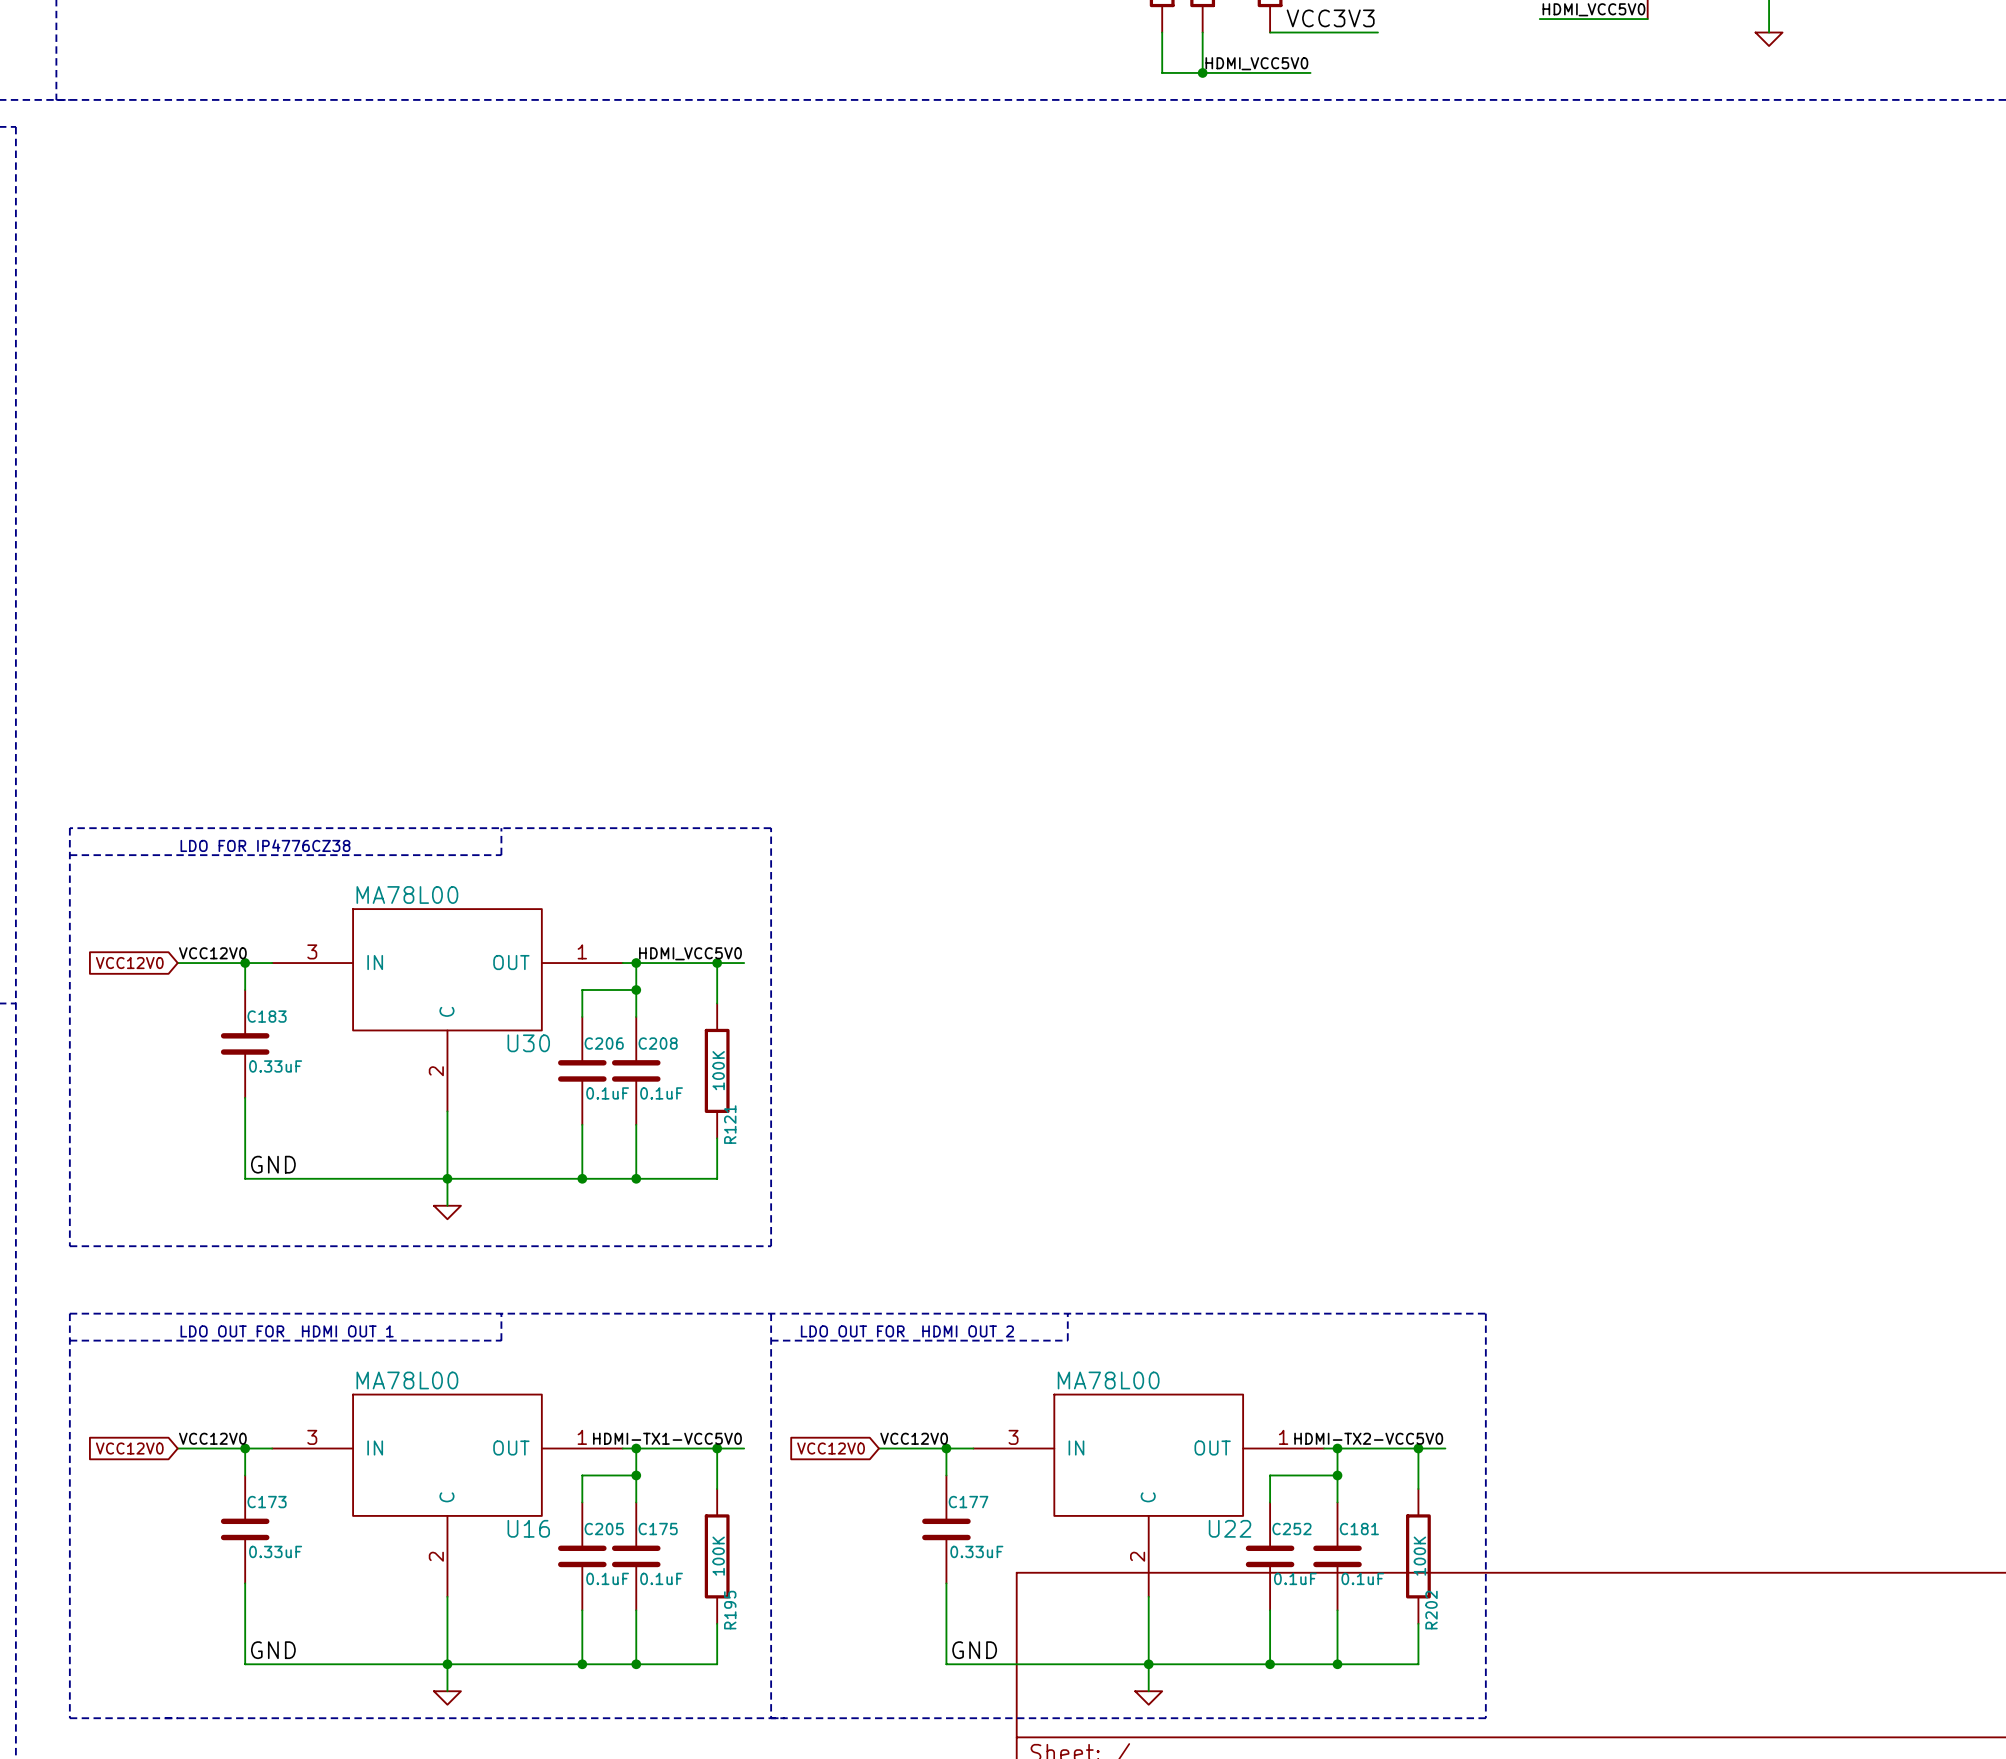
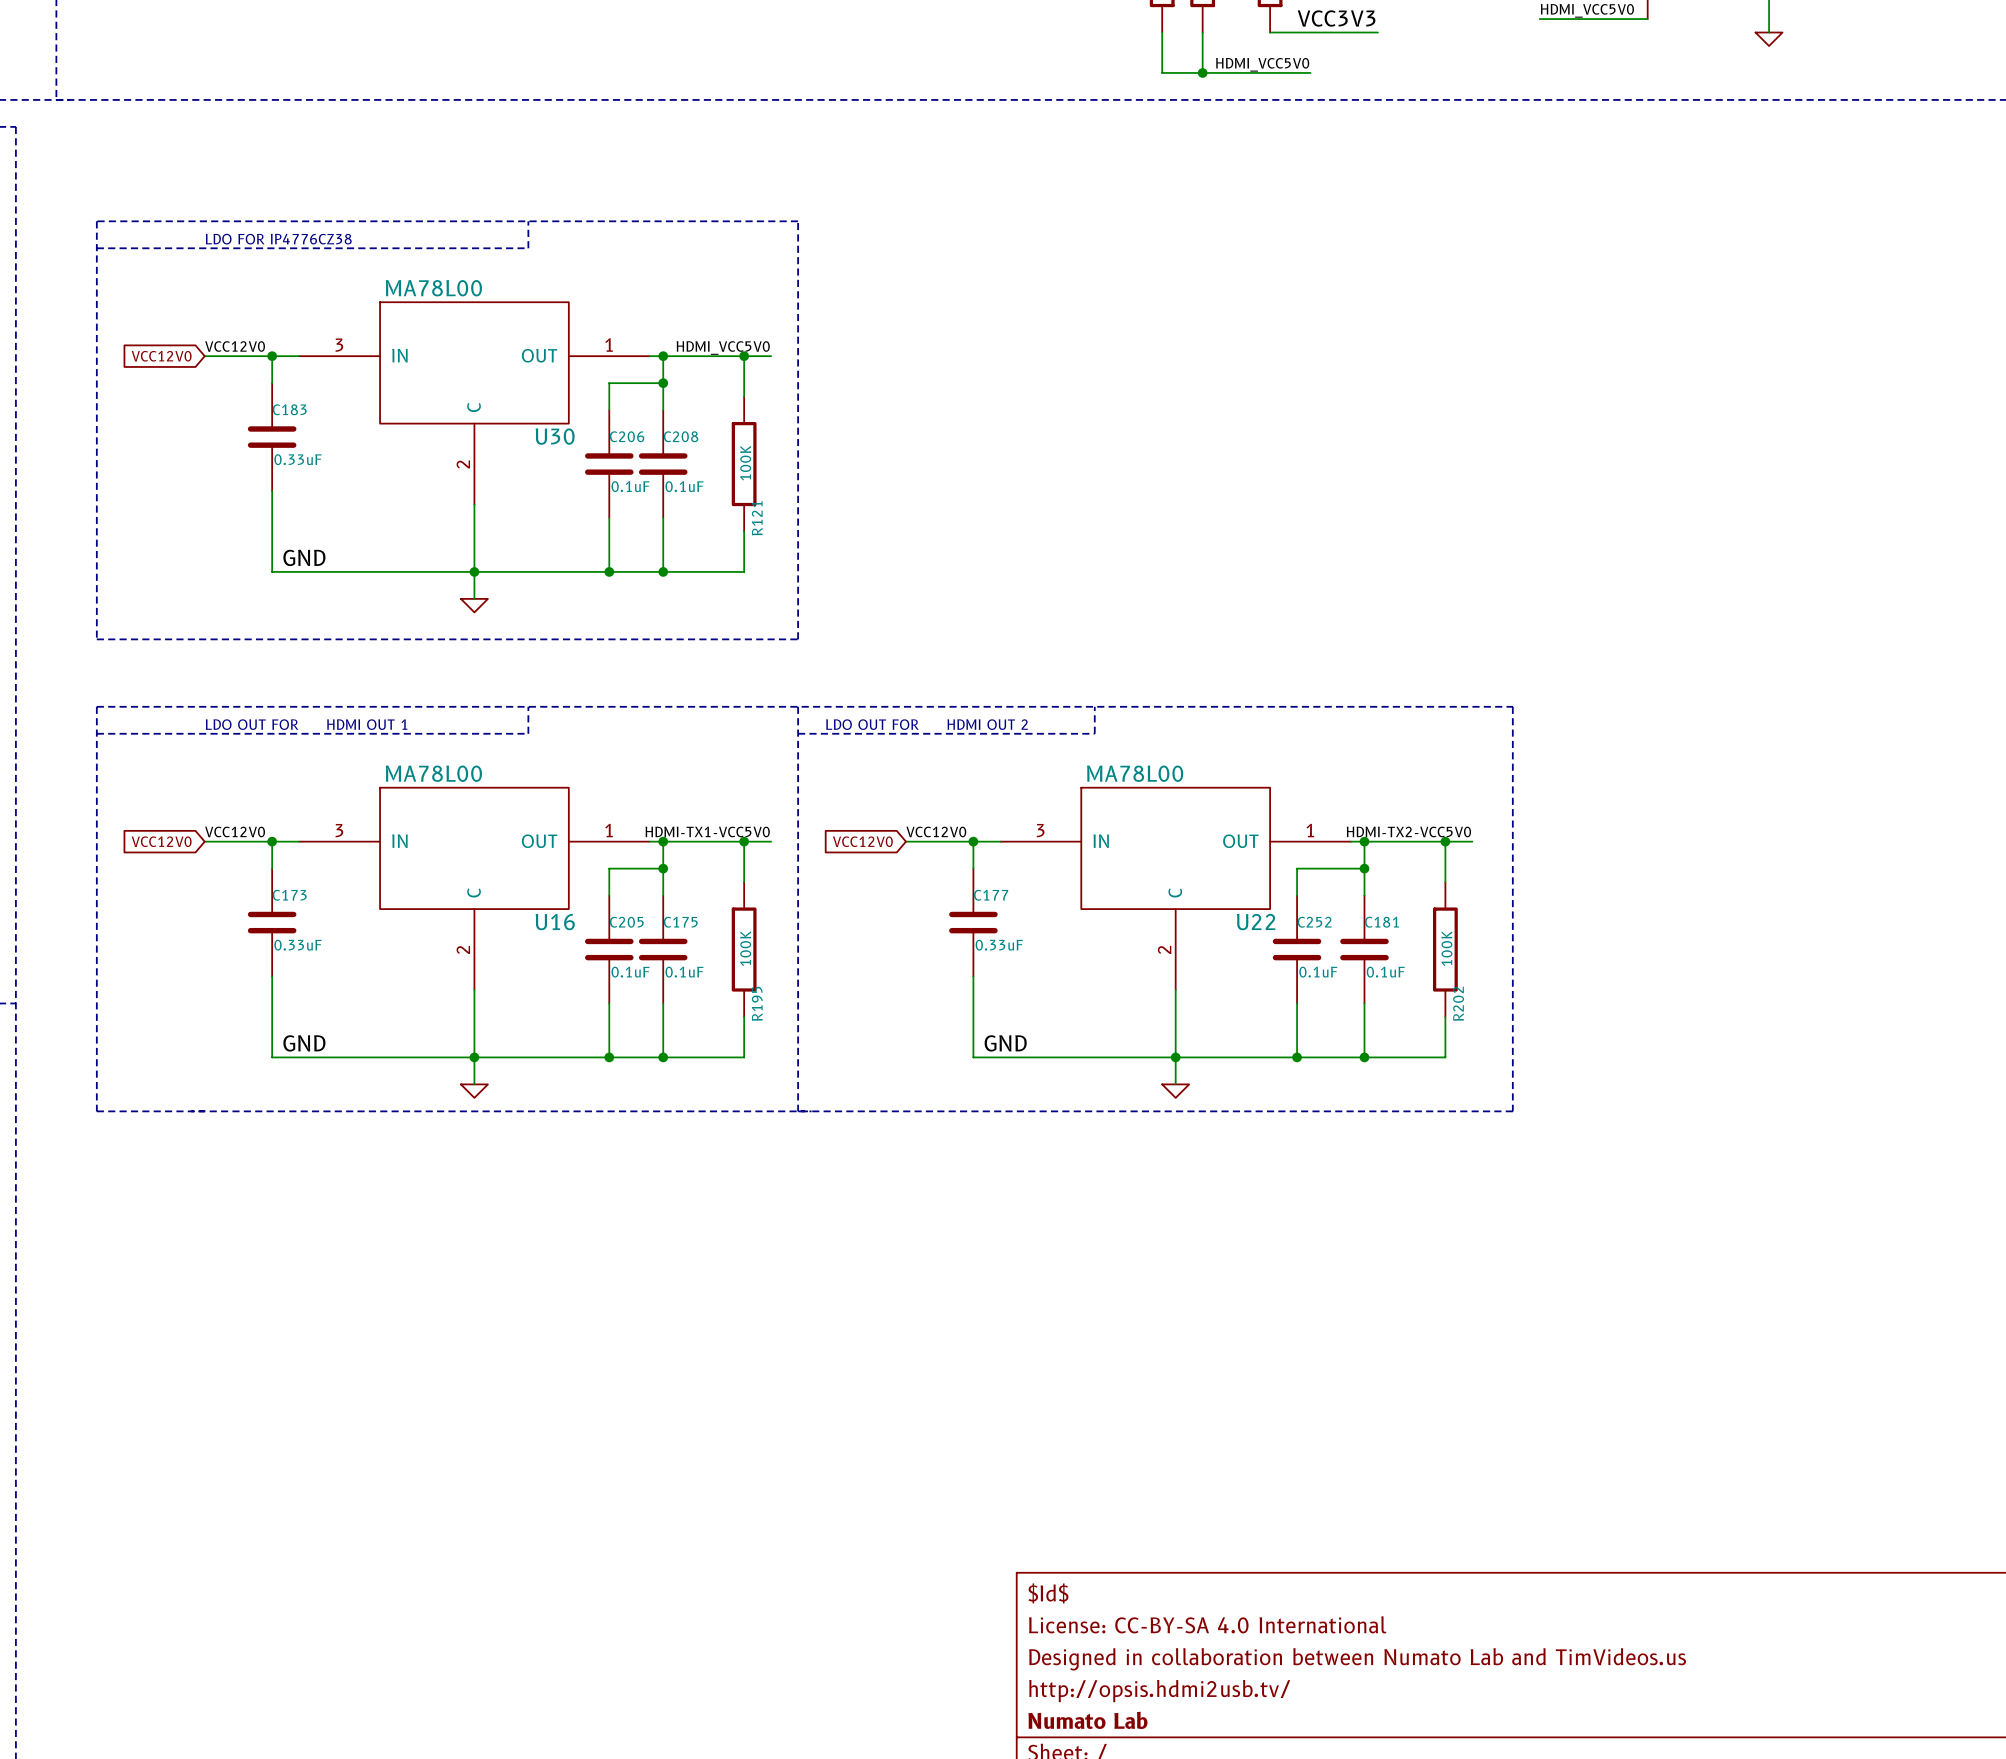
line: none -> (96, 221) (798, 221) (798, 639) (96, 639) (96, 221)
line: none -> (528, 221) (528, 248) (96, 248)
text: none -> LDO FOR IP4776CZ38 (278, 239)
label: none -> VCC12V0 (235, 346)
label: none -> HDMI_VCC5V0 (723, 348)
global label: none -> VCC12V0 (161, 356)
wire: none -> (204, 356) (299, 356)
wire: none -> (272, 356) (272, 383)
junction: none -> (272, 356)
wire: none -> (649, 356) (771, 356)
wire: none -> (663, 356) (663, 410)
junction: none -> (663, 356)
wire: none -> (744, 356) (744, 396)
junction: none -> (744, 356)
wire: none -> (663, 383) (609, 383) (609, 410)
junction: none -> (663, 383)
wire: none -> (272, 491) (272, 571) (744, 571) (744, 531)
wire: none -> (474, 504) (474, 598)
wire: none -> (609, 518) (609, 571)
wire: none -> (663, 518) (663, 571)
label: none -> GND (304, 557)
junction: none -> (474, 571)
junction: none -> (609, 571)
junction: none -> (663, 571)
power symbol: none -> (474, 605)
line: none -> (96, 706) (96, 1111) (1512, 1111) (1512, 706) (96, 706)
line: none -> (798, 706) (798, 1111)
line: none -> (1094, 706) (1094, 733) (798, 733)
text: none -> LDO OUT FOR (252, 724)
text: none -> HDMI OUT 1 (367, 724)
text: none -> LDO OUT FOR (872, 724)
text: none -> HDMI OUT 2 (987, 724)
line: (69, 828) (771, 828) (771, 1246) (69, 1246) (69, 828) -> none
line: (501, 828) (501, 855) (69, 855) -> (528, 706) (528, 733) (96, 733)
label: none -> HDMI-TX1-VCC5V0 (707, 831)
label: none -> VCC12V0 (936, 831)
label: none -> HDMI-TX2-VCC5V0 (1408, 831)
junction: none -> (272, 841)
junction: none -> (663, 841)
junction: none -> (744, 841)
global label: none -> VCC12V0 (862, 841)
wire: none -> (905, 841) (1000, 841)
wire: none -> (973, 841) (973, 868)
junction: none -> (973, 841)
wire: none -> (1351, 841) (1472, 841)
wire: none -> (1364, 841) (1364, 895)
junction: none -> (1364, 841)
wire: none -> (1445, 841) (1445, 882)
junction: none -> (1445, 841)
text: LDO FOR IP4776CZ38 (265, 845) -> none
junction: none -> (663, 868)
wire: none -> (1364, 868) (1297, 868) (1297, 895)
junction: none -> (1364, 868)
label position: VCC12V0 (212, 953) -> VCC12V0 (235, 831)
label: HDMI_VCC5V0 (690, 953) -> none
global label position: VCC12V0 (129, 963) -> VCC12V0 (161, 841)
wire: (177, 963) (272, 963) -> (204, 841) (299, 841)
wire: (245, 963) (245, 990) -> (272, 841) (272, 868)
junction: (245, 963) -> none
wire: (622, 963) (744, 963) -> (649, 841) (771, 841)
wire: (636, 963) (636, 1016) -> (663, 841) (663, 895)
junction: (636, 963) -> none
wire: (717, 963) (717, 1003) -> (744, 841) (744, 882)
junction: (717, 963) -> none
wire: none -> (973, 976) (973, 1057) (1445, 1057) (1445, 1016)
wire: (636, 990) (582, 990) (582, 1016) -> (663, 868) (609, 868) (609, 895)
junction: (636, 990) -> none
wire: none -> (1175, 990) (1175, 1084)
wire: none -> (1297, 1003) (1297, 1057)
wire: none -> (1364, 1003) (1364, 1057)
U30 position: (447, 1010) -> (474, 403)
C183 position: (245, 1043) -> (272, 437)
label: none -> GND (1005, 1043)
junction: none -> (474, 1057)
junction: none -> (609, 1057)
junction: none -> (663, 1057)
junction: none -> (1175, 1057)
junction: none -> (1297, 1057)
junction: none -> (1364, 1057)
C206 position: (582, 1070) -> (609, 464)
C208 position: (636, 1070) -> (663, 464)
R121 position: (717, 1070) -> (744, 464)
power symbol: none -> (1175, 1091)
wire: (245, 1097) (245, 1178) (717, 1178) (717, 1138) -> (272, 976) (272, 1057) (744, 1057) (744, 1016)
wire: (447, 1111) (447, 1205) -> (474, 990) (474, 1084)
wire: (582, 1124) (582, 1178) -> (609, 1003) (609, 1057)
wire: (636, 1124) (636, 1178) -> (663, 1003) (663, 1057)
label position: GND (273, 1164) -> GND (304, 1043)
junction: (447, 1178) -> none
junction: (582, 1178) -> none
junction: (636, 1178) -> none
power symbol position: (447, 1212) -> (474, 1091)
line: (69, 1313) (69, 1718) (1485, 1718) (1485, 1313) (69, 1313) -> none
line: (501, 1313) (501, 1340) (69, 1340) -> none
line: (771, 1313) (771, 1718) -> none
line: (1067, 1313) (1067, 1340) (771, 1340) -> none
text: LDO OUT FOR (232, 1331) -> none
text: HDMI OUT 1 (347, 1331) -> none
text: LDO OUT FOR (852, 1331) -> none
text: HDMI OUT 2 (968, 1331) -> none
label: VCC12V0 (212, 1438) -> none
label: HDMI-TX1-VCC5V0 (667, 1438) -> none
label: VCC12V0 (914, 1438) -> none
label: HDMI-TX2-VCC5V0 (1368, 1438) -> none
global label: VCC12V0 (129, 1448) -> none
wire: (177, 1448) (272, 1448) -> none
wire: (245, 1448) (245, 1475) -> none
junction: (245, 1448) -> none
wire: (622, 1448) (744, 1448) -> none
wire: (636, 1448) (636, 1502) -> none
junction: (636, 1448) -> none
wire: (717, 1448) (717, 1488) -> none
junction: (717, 1448) -> none
global label: VCC12V0 (831, 1448) -> none
wire: (879, 1448) (973, 1448) -> none
wire: (946, 1448) (946, 1475) -> none
junction: (946, 1448) -> none
wire: (1324, 1448) (1445, 1448) -> none
wire: (1337, 1448) (1337, 1502) -> none
junction: (1337, 1448) -> none
wire: (1418, 1448) (1418, 1488) -> none
junction: (1418, 1448) -> none
wire: (636, 1475) (582, 1475) (582, 1502) -> none
junction: (636, 1475) -> none
wire: (1337, 1475) (1270, 1475) (1270, 1502) -> none
junction: (1337, 1475) -> none
U16 position: (447, 1495) -> (474, 888)
U22 position: (1148, 1495) -> (1175, 888)
C173 position: (245, 1529) -> (272, 922)
C177 position: (946, 1529) -> (973, 922)
C205 position: (582, 1556) -> (609, 949)
C175 position: (636, 1556) -> (663, 949)
R195 position: (717, 1556) -> (744, 949)
C252 position: (1270, 1556) -> (1297, 949)
C181 position: (1337, 1556) -> (1364, 949)
R202 position: (1418, 1556) -> (1445, 949)
wire: (245, 1583) (245, 1664) (717, 1664) (717, 1623) -> none
wire: (946, 1583) (946, 1664) (1418, 1664) (1418, 1623) -> none
title block: none -> $Id$ (1048, 1593)
wire: (447, 1596) (447, 1691) -> none
wire: (1148, 1596) (1148, 1691) -> none
wire: (582, 1610) (582, 1664) -> none
wire: (636, 1610) (636, 1664) -> none
wire: (1270, 1610) (1270, 1664) -> none
wire: (1337, 1610) (1337, 1664) -> none
title block: none -> License: CC-BY-SA 4.0 International (1207, 1624)
label: GND (273, 1650) -> none
label: GND (974, 1650) -> none
title block: none -> Designed in collaboration between Numato Lab and TimVideos.us (1357, 1659)
junction: (447, 1664) -> none
junction: (582, 1664) -> none
junction: (636, 1664) -> none
junction: (1148, 1664) -> none
junction: (1270, 1664) -> none
junction: (1337, 1664) -> none
title block: none -> http://opsis.hdmi2usb.tv/ (1159, 1691)
power symbol: (447, 1697) -> none
power symbol: (1148, 1697) -> none
title block: none -> Numato Lab (1087, 1720)

